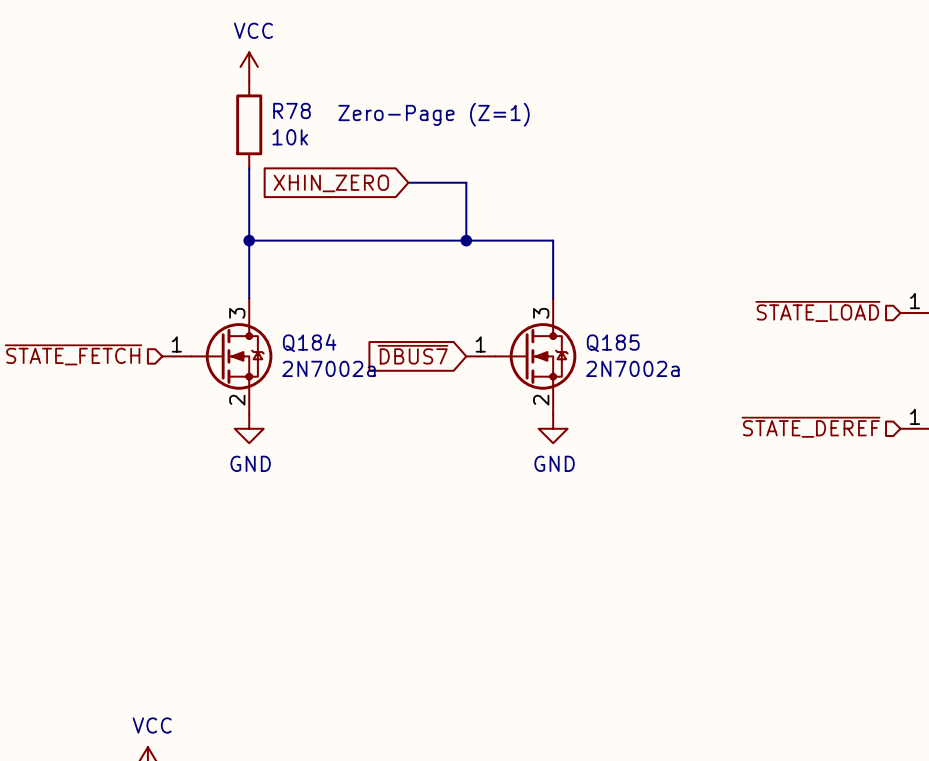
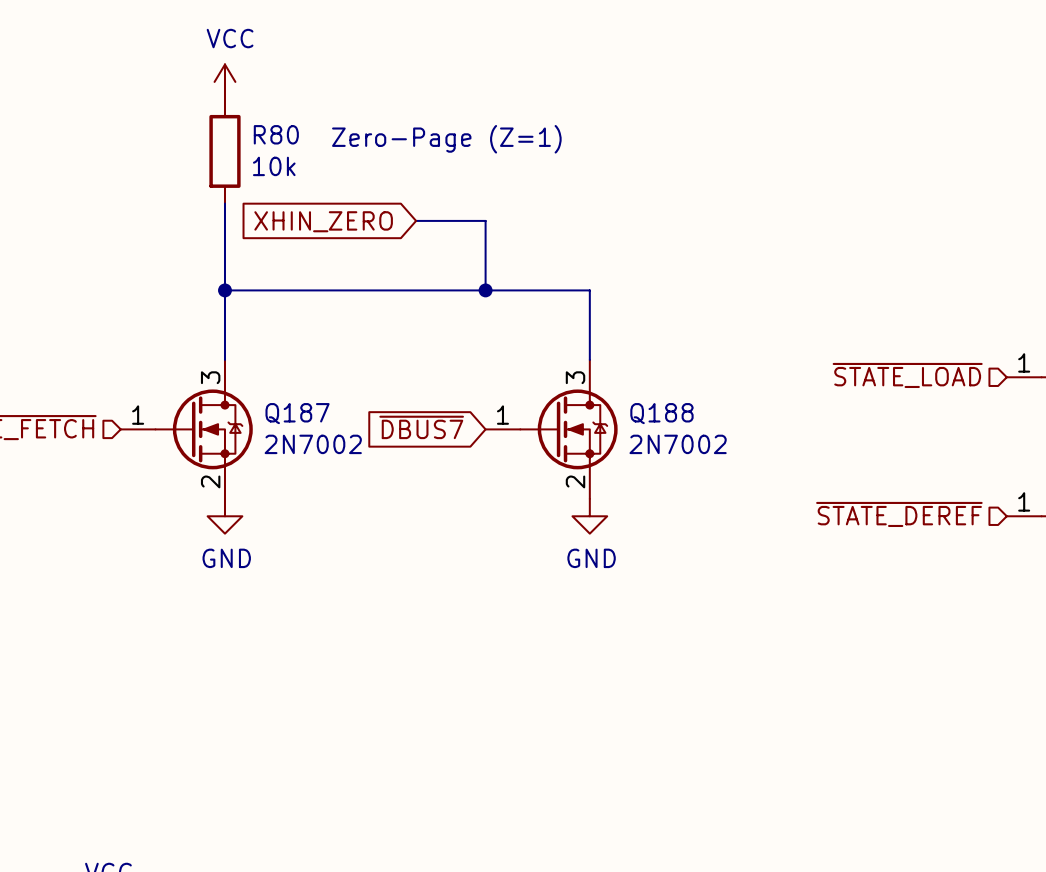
R78 name: R78 (291, 110) -> R80 (276, 134)
Q184 name: Q184 (309, 342) -> Q187 (297, 413)
Q185 name: Q185 (613, 343) -> Q188 (661, 413)
Q184 value: 2N7002a (328, 368) -> 2N7002 (313, 444)
Q185 value: 2N7002a (632, 368) -> 2N7002 (678, 444)

